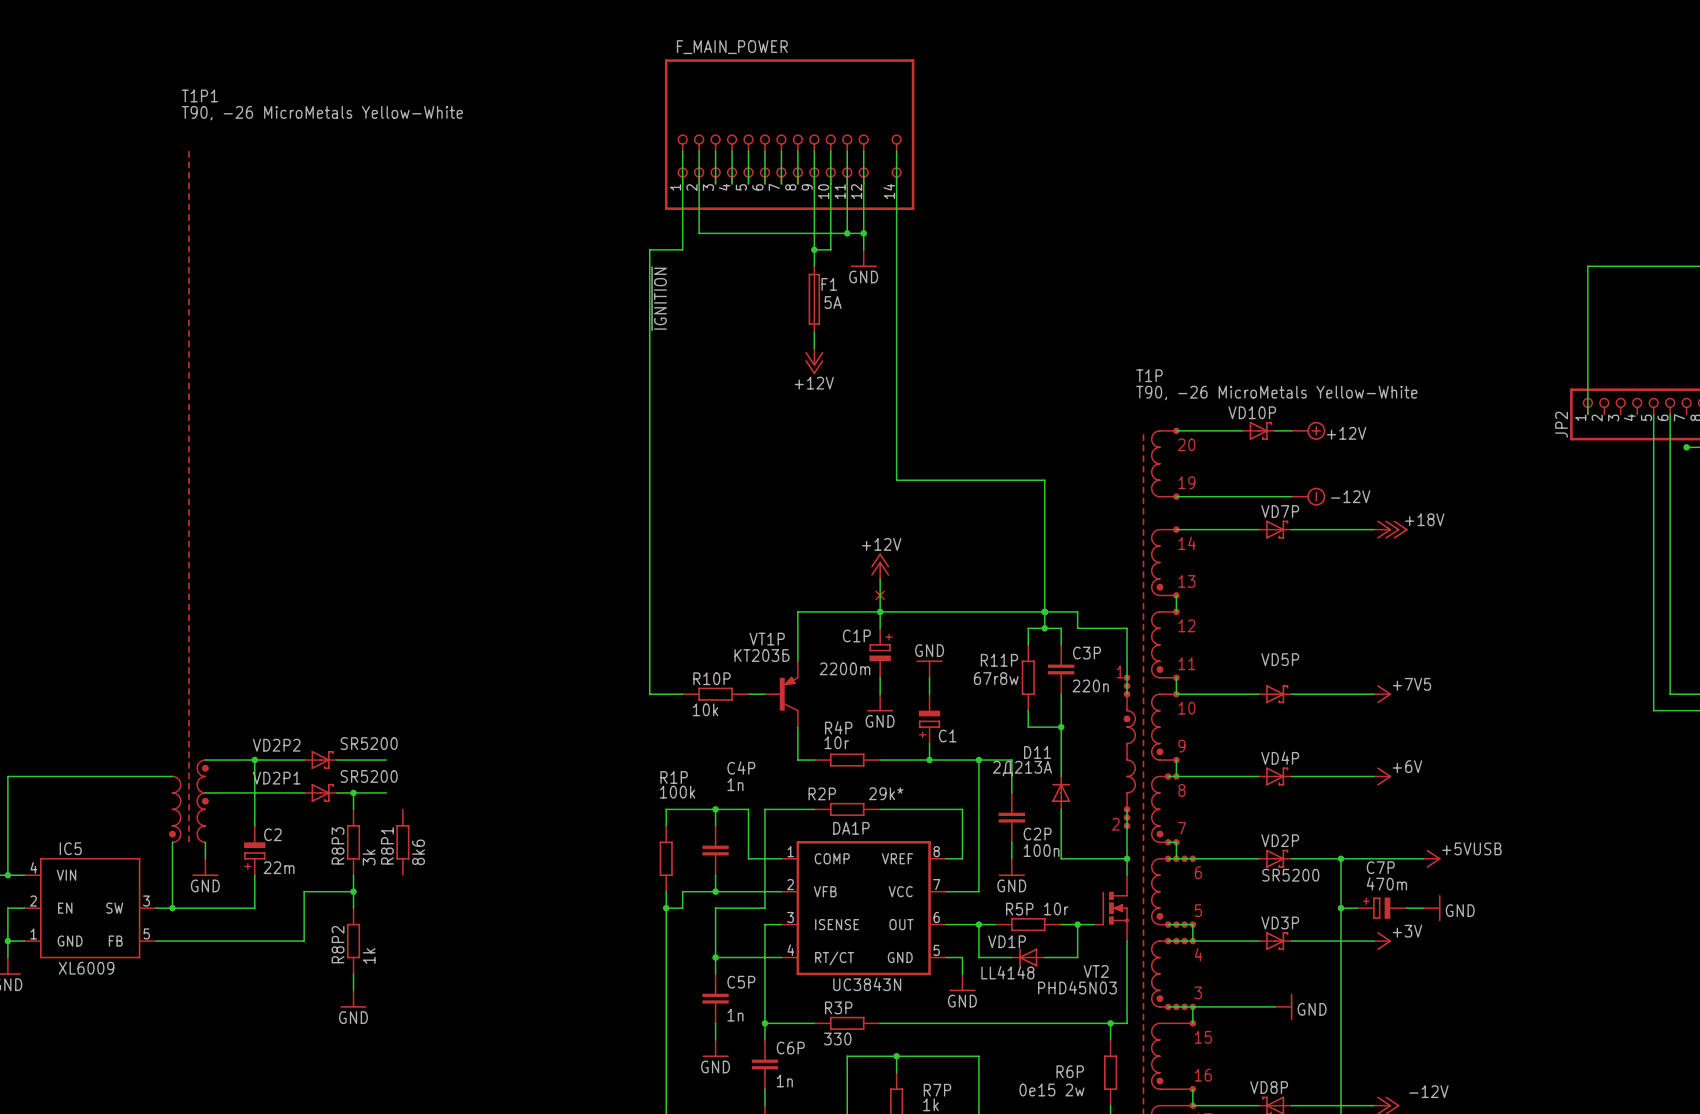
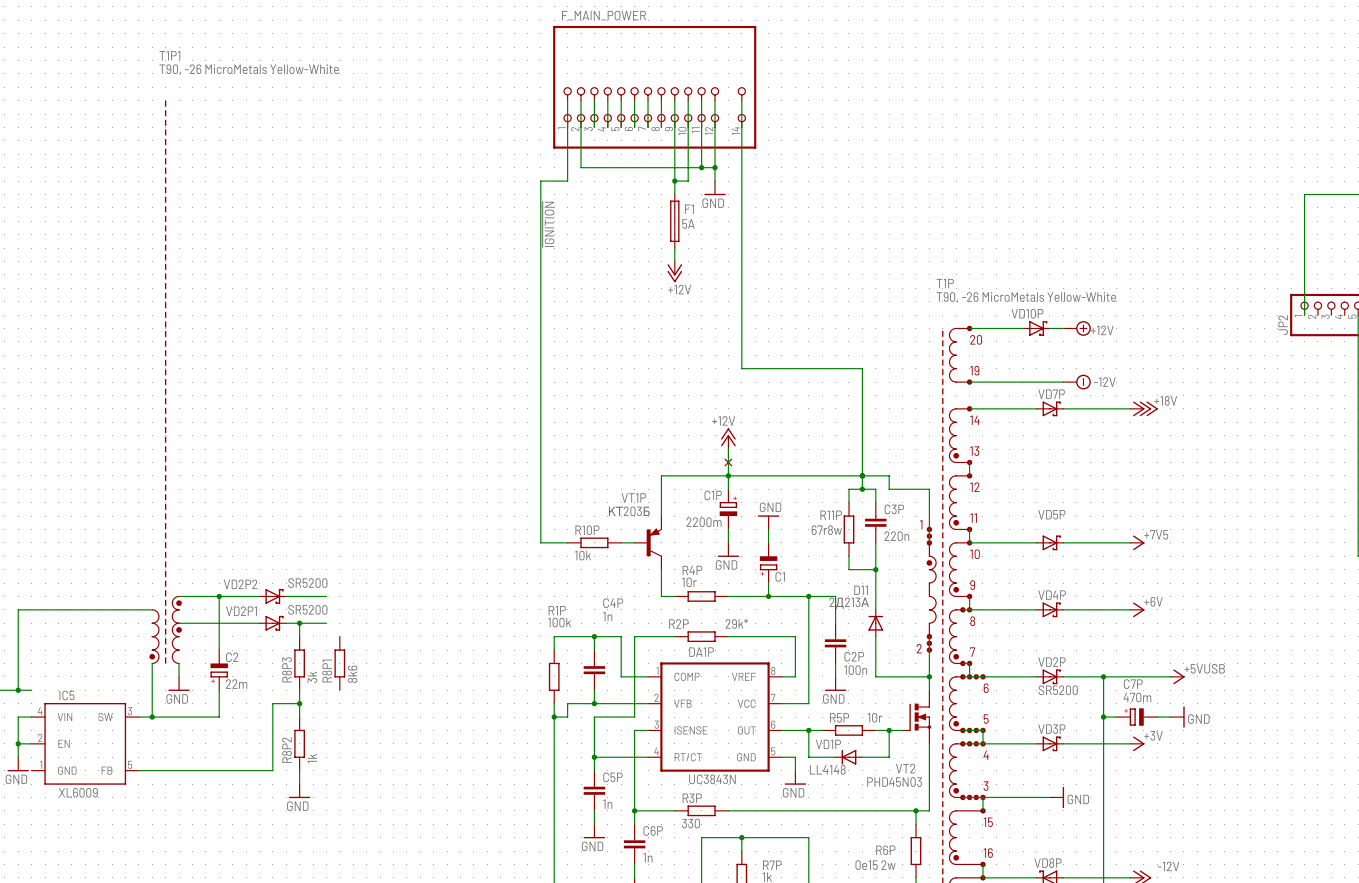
IC5 symbol: [24, 857, 157, 959] -> [31, 702, 139, 785]
wire: (320, 891) (304, 891) (304, 941) (156, 941) -> (272, 703) (272, 770) (138, 770)

